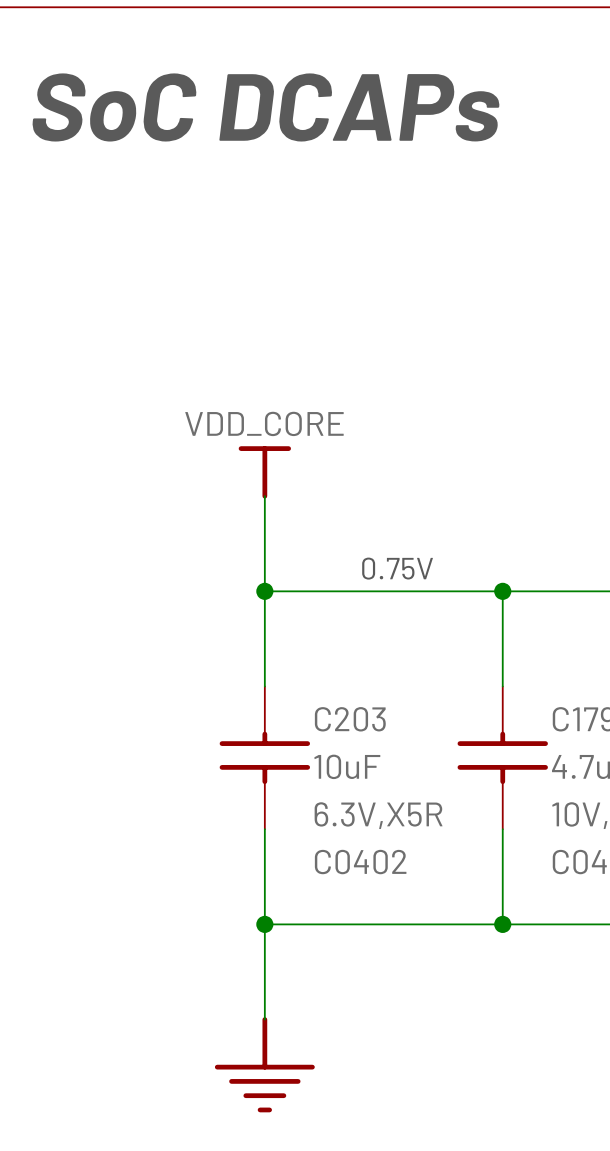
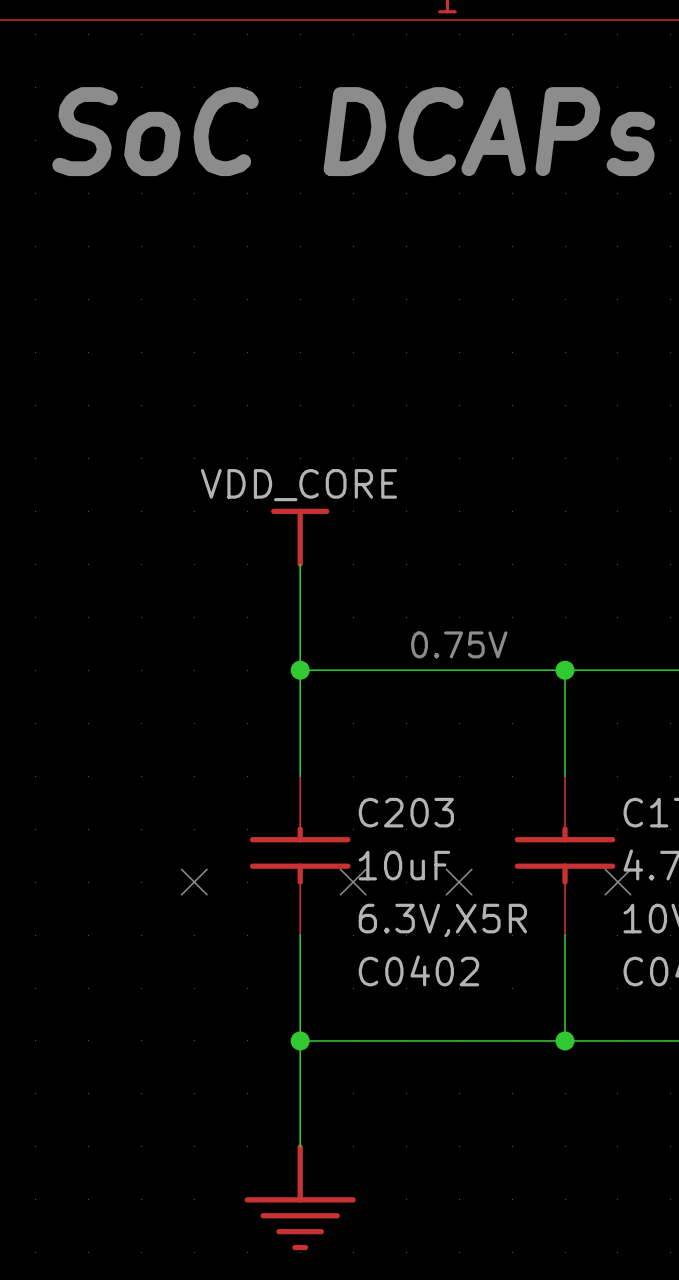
no-connect mark: none -> (194, 882)
no-connect mark: none -> (353, 882)
no-connect mark: none -> (459, 882)
no-connect mark: none -> (617, 882)

